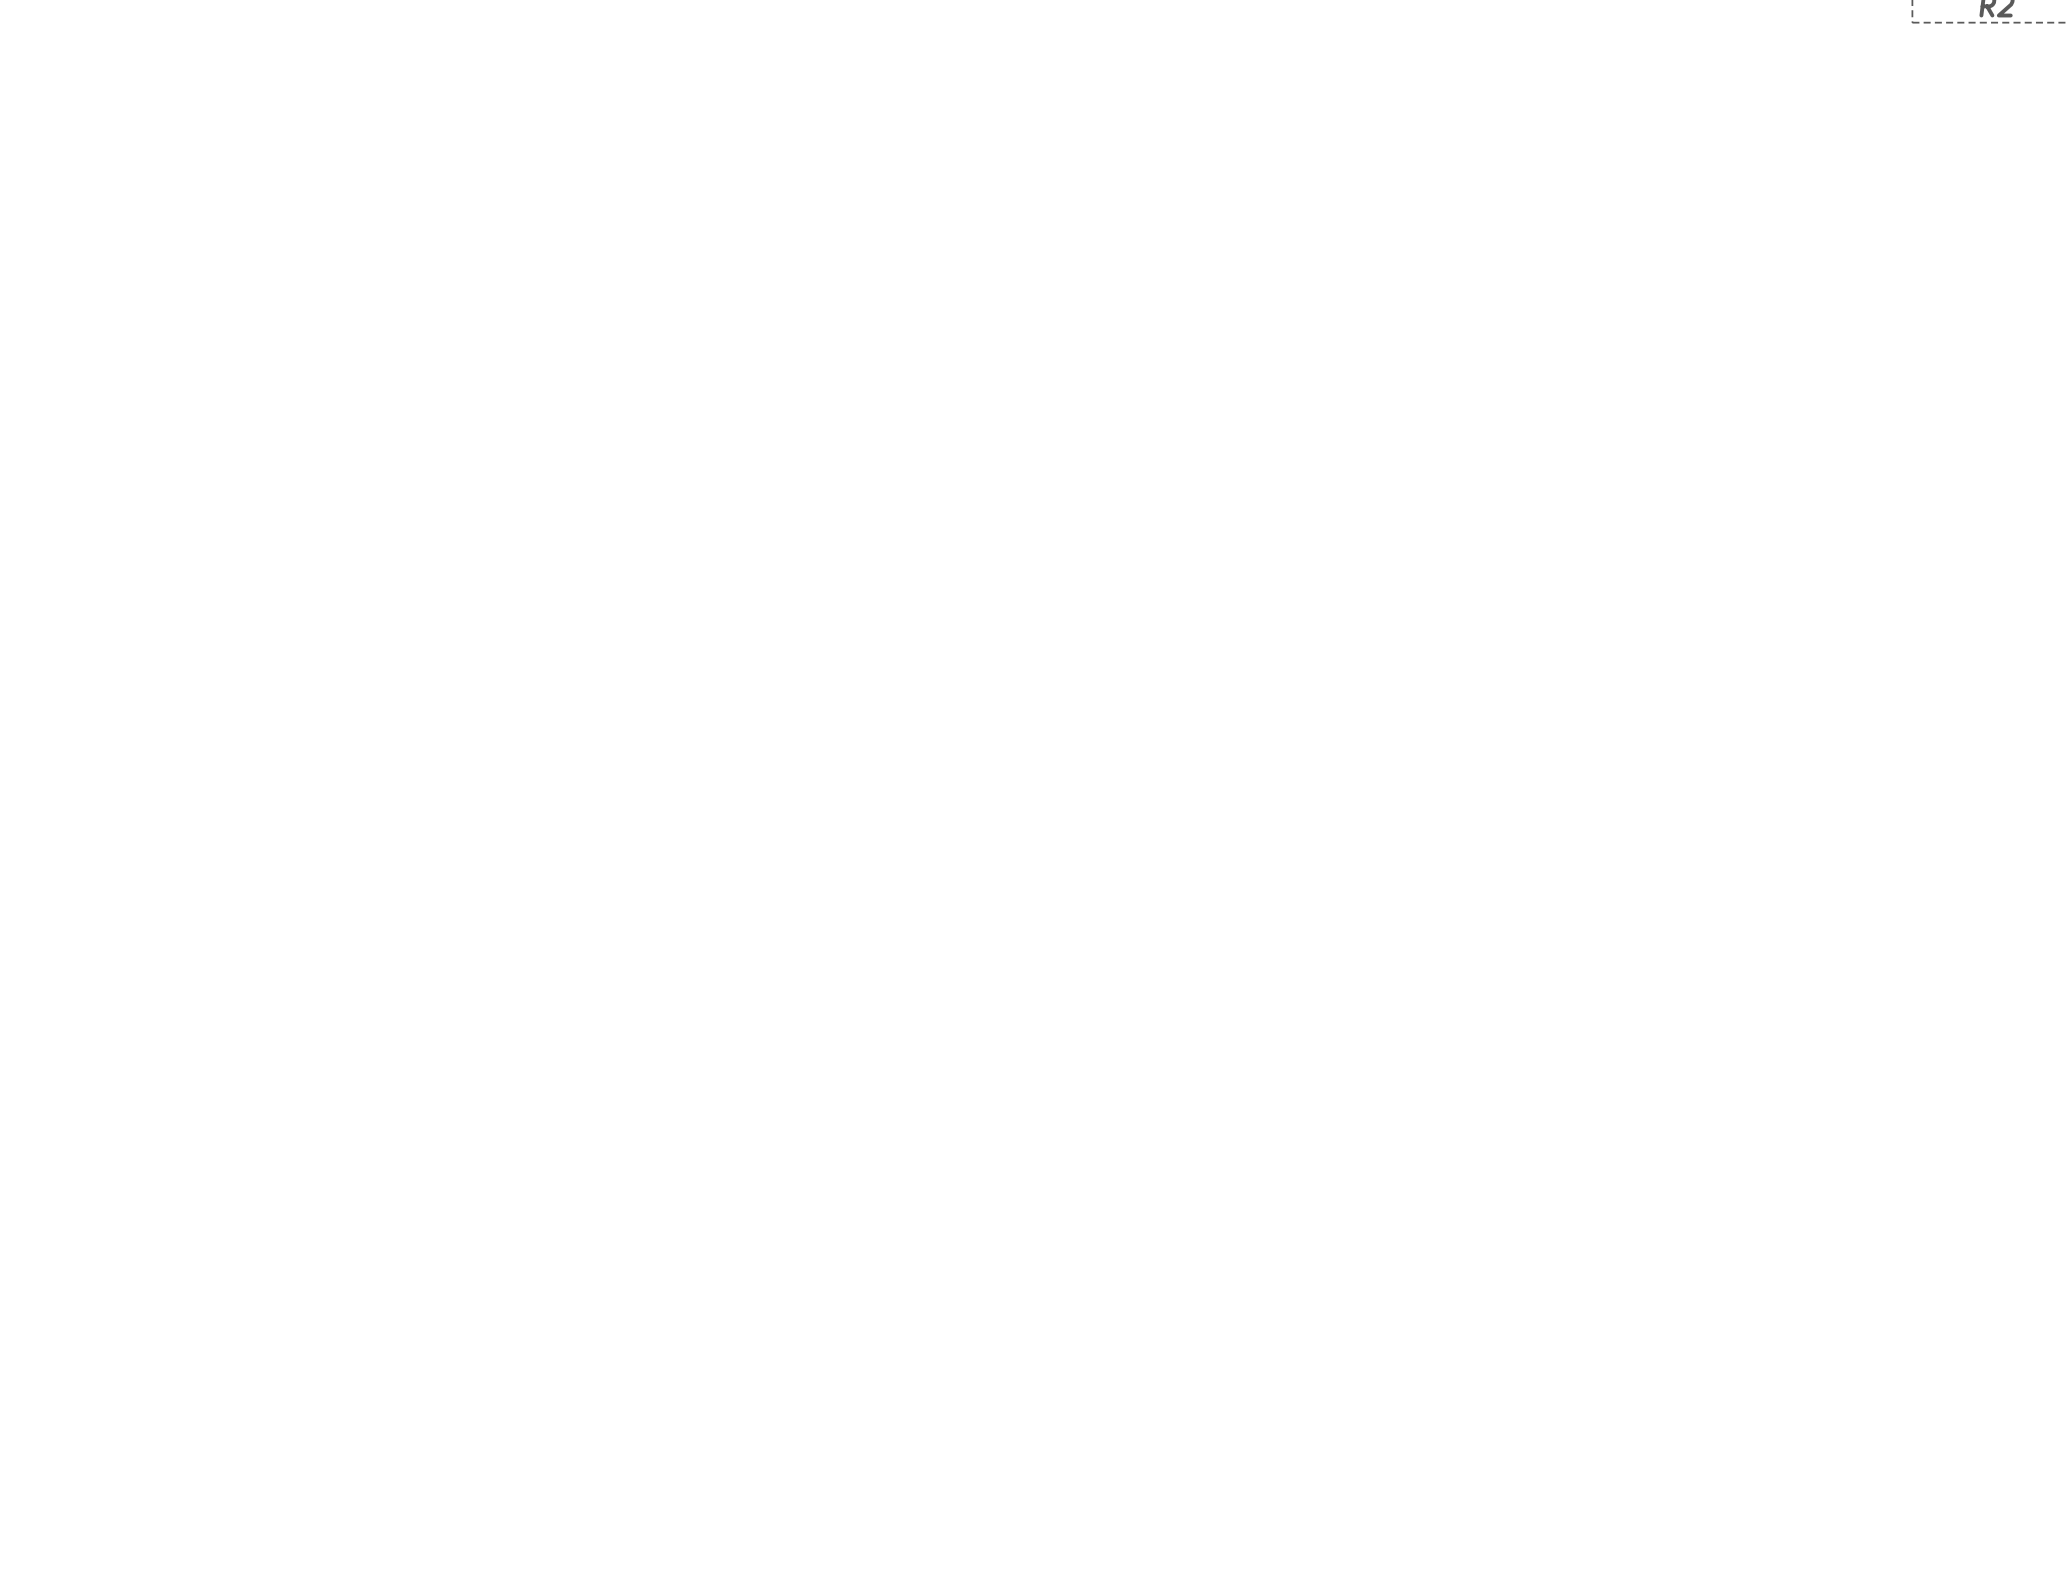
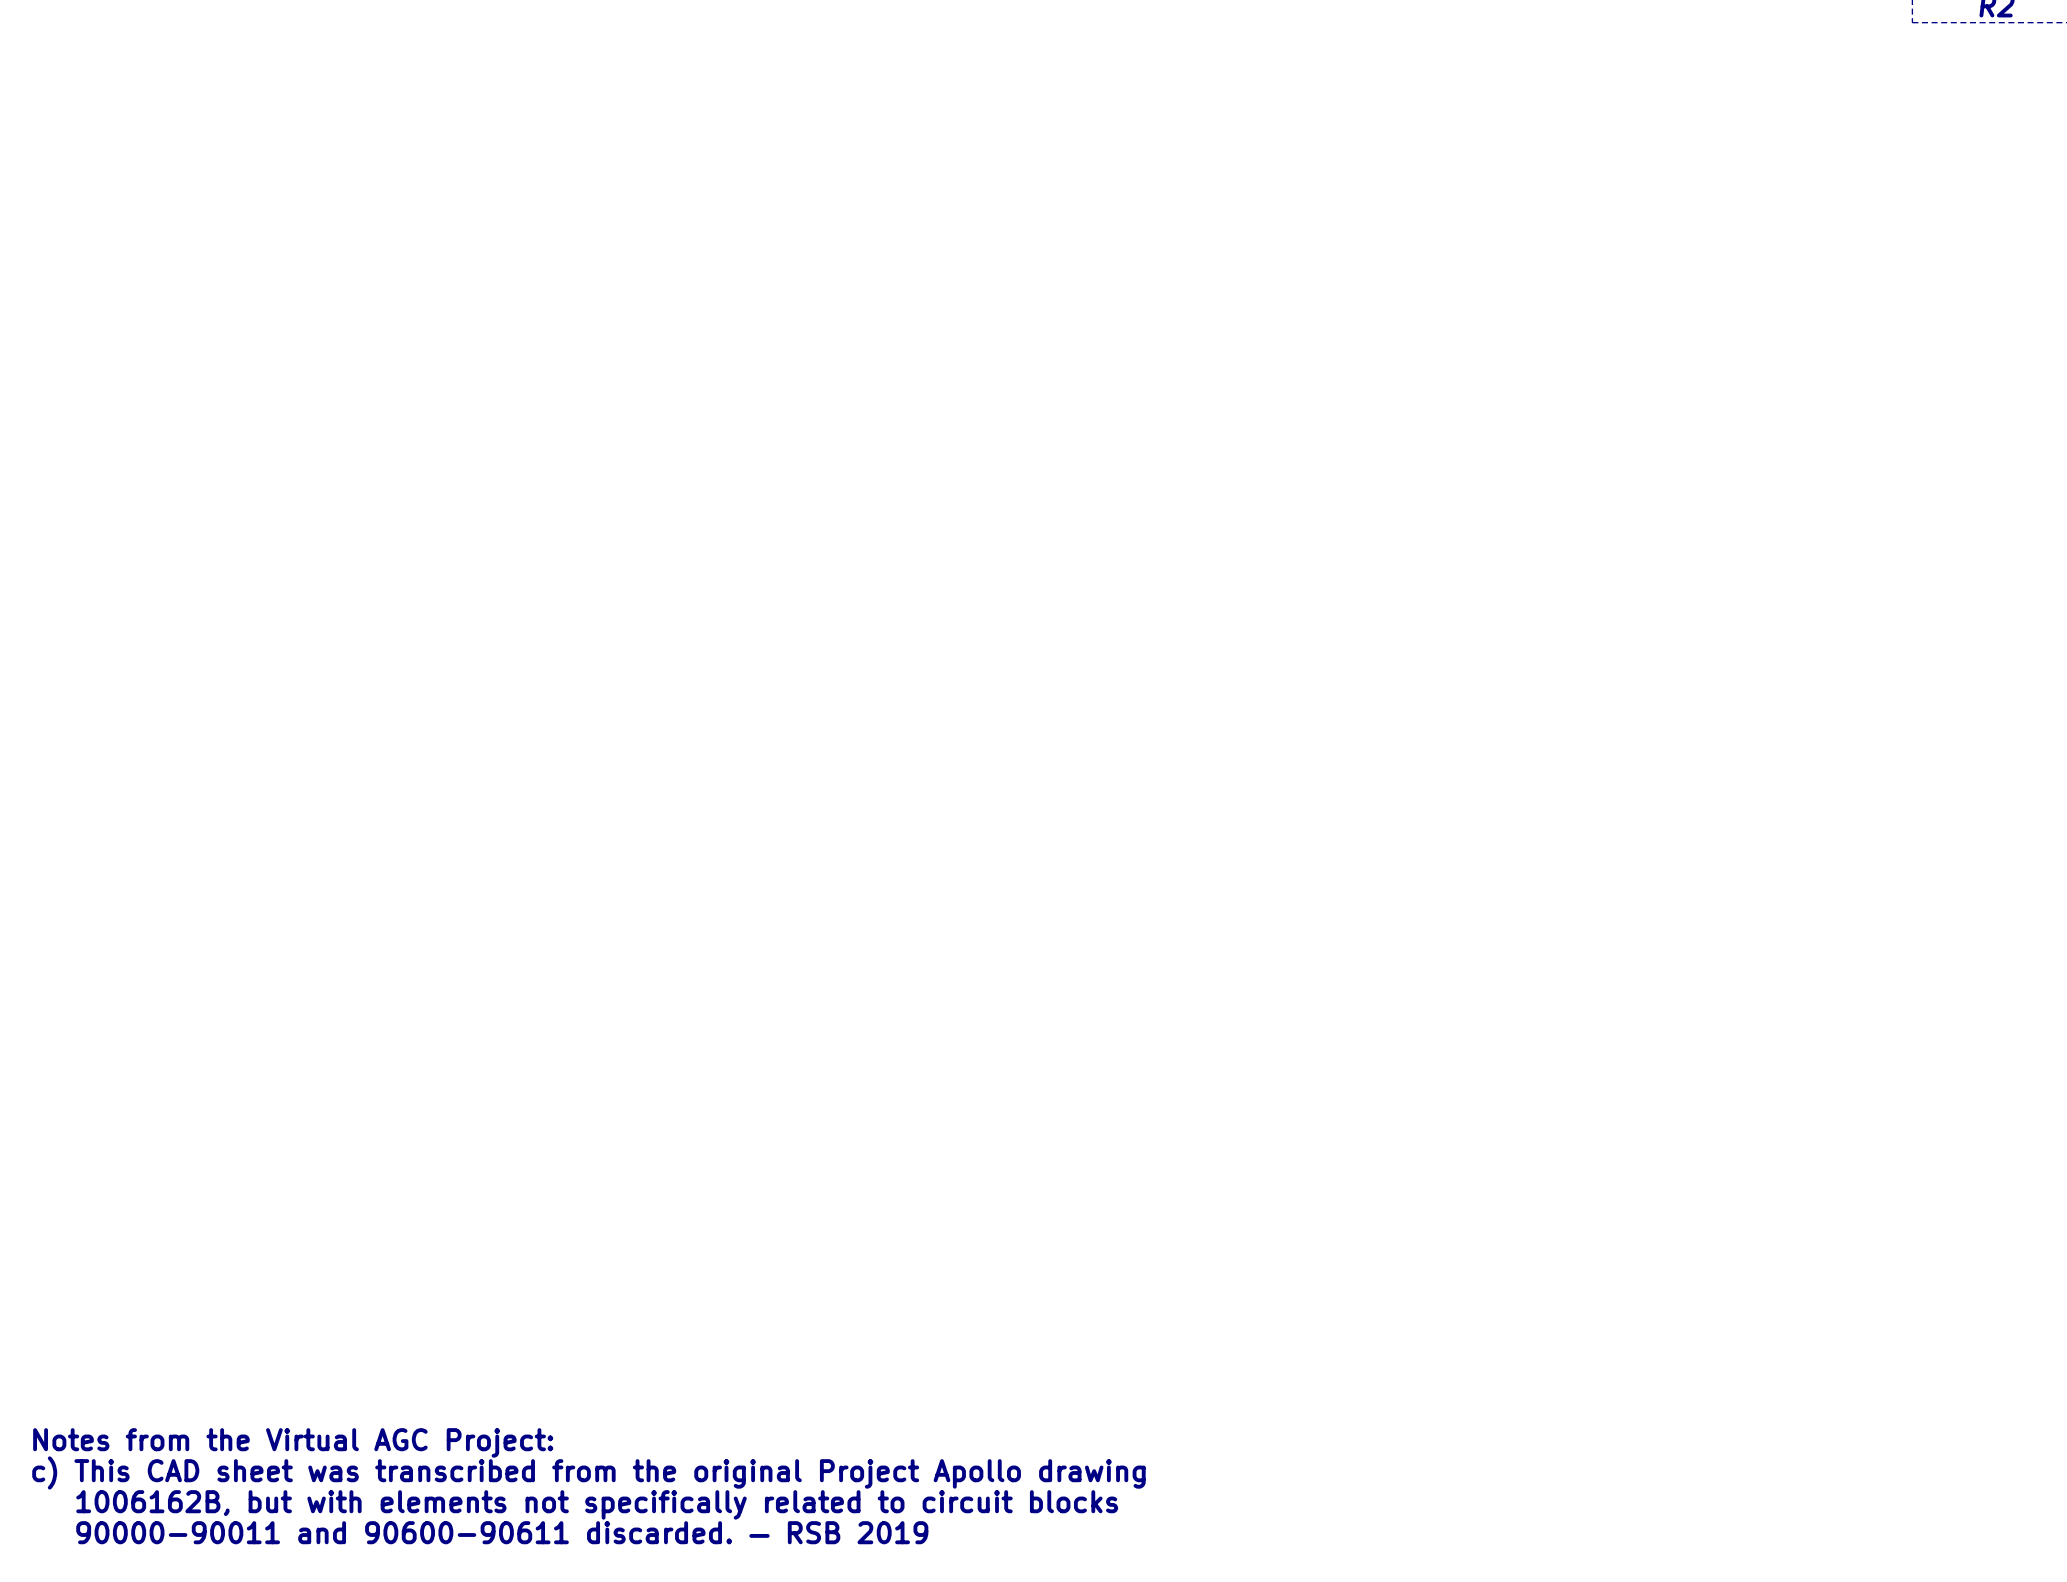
text: none -> Notes from the Virtual AGC Project: (293, 1442)
text: none -> c) This CAD sheet was transcribed from the original Project Apollo drawing (588, 1472)
text: none -> 1006162B, but with elements not specifically related to circuit blocks (597, 1504)
text: none -> 90000-90011 and 90600-90611 discarded. — RSB 2019 (502, 1532)

